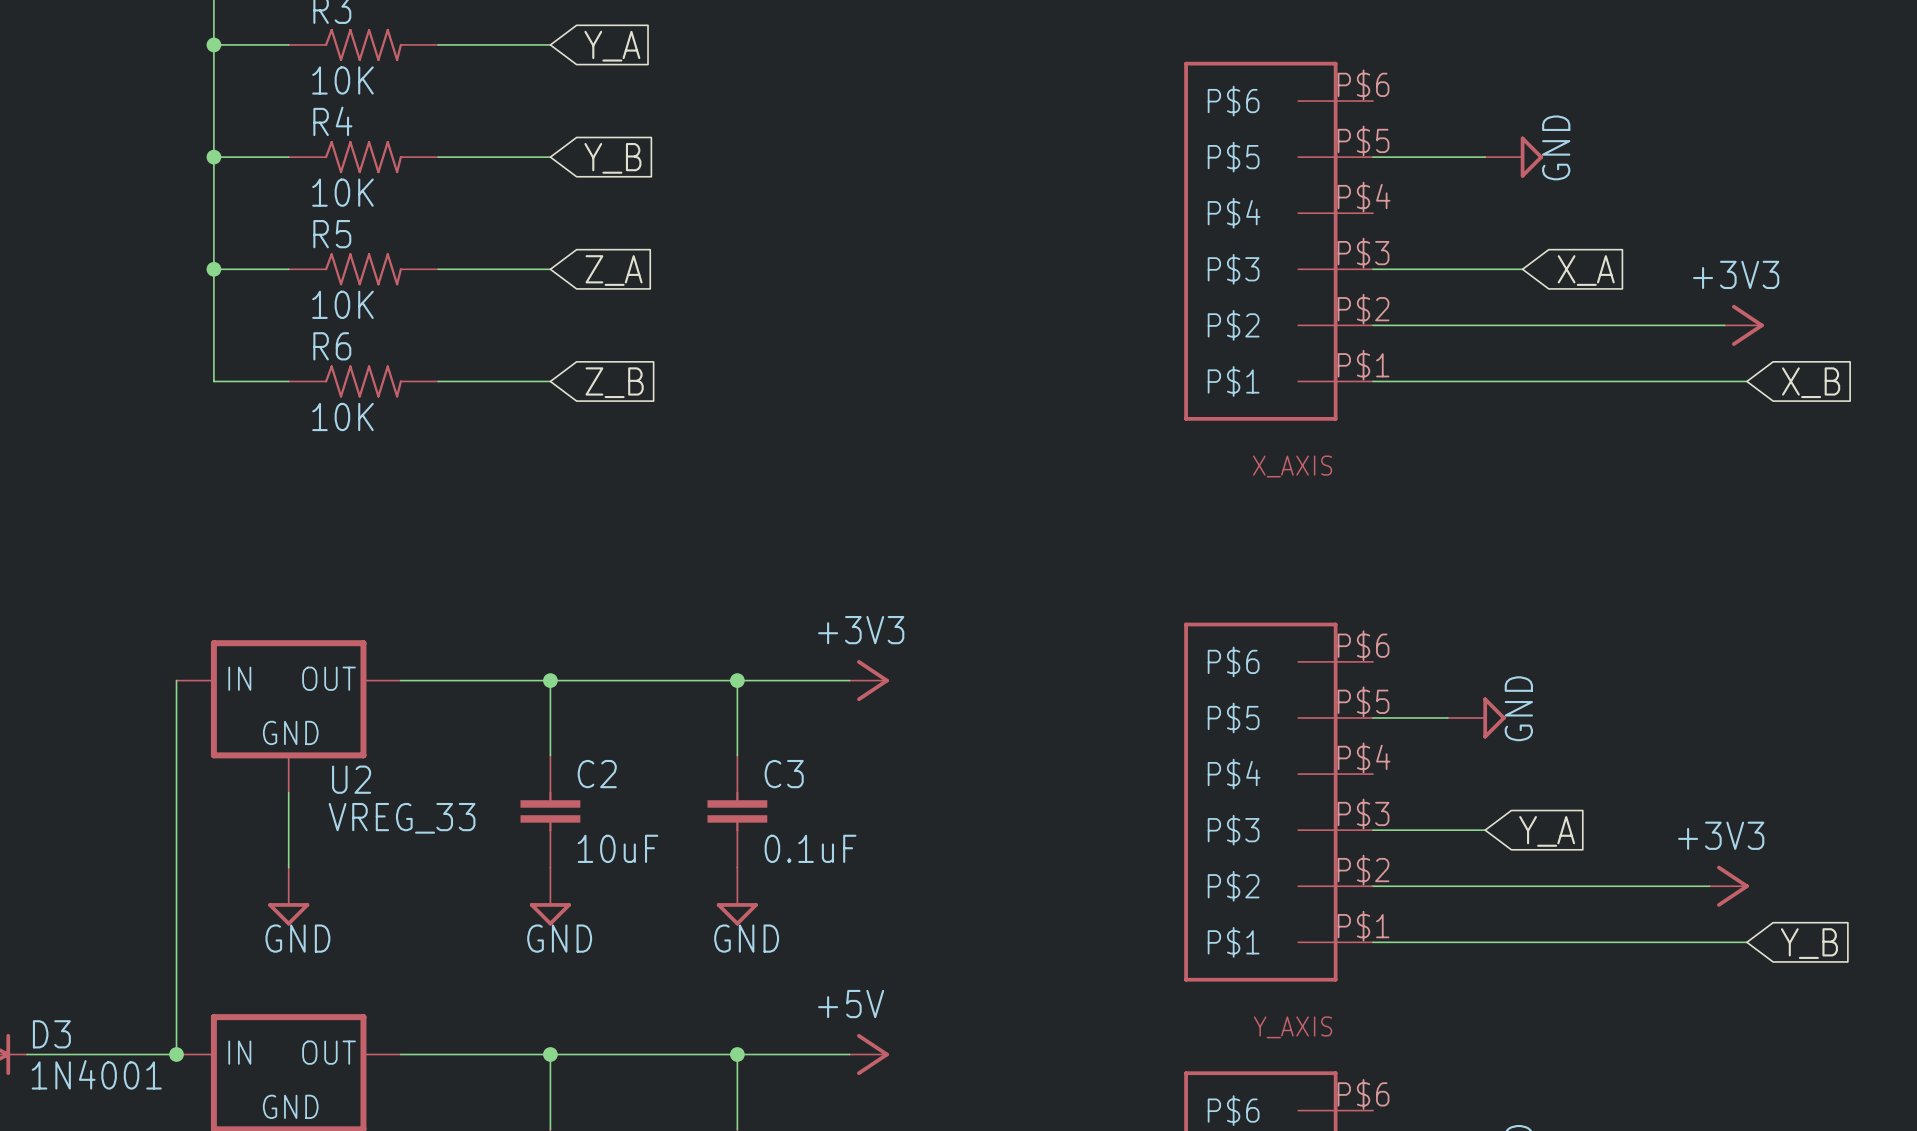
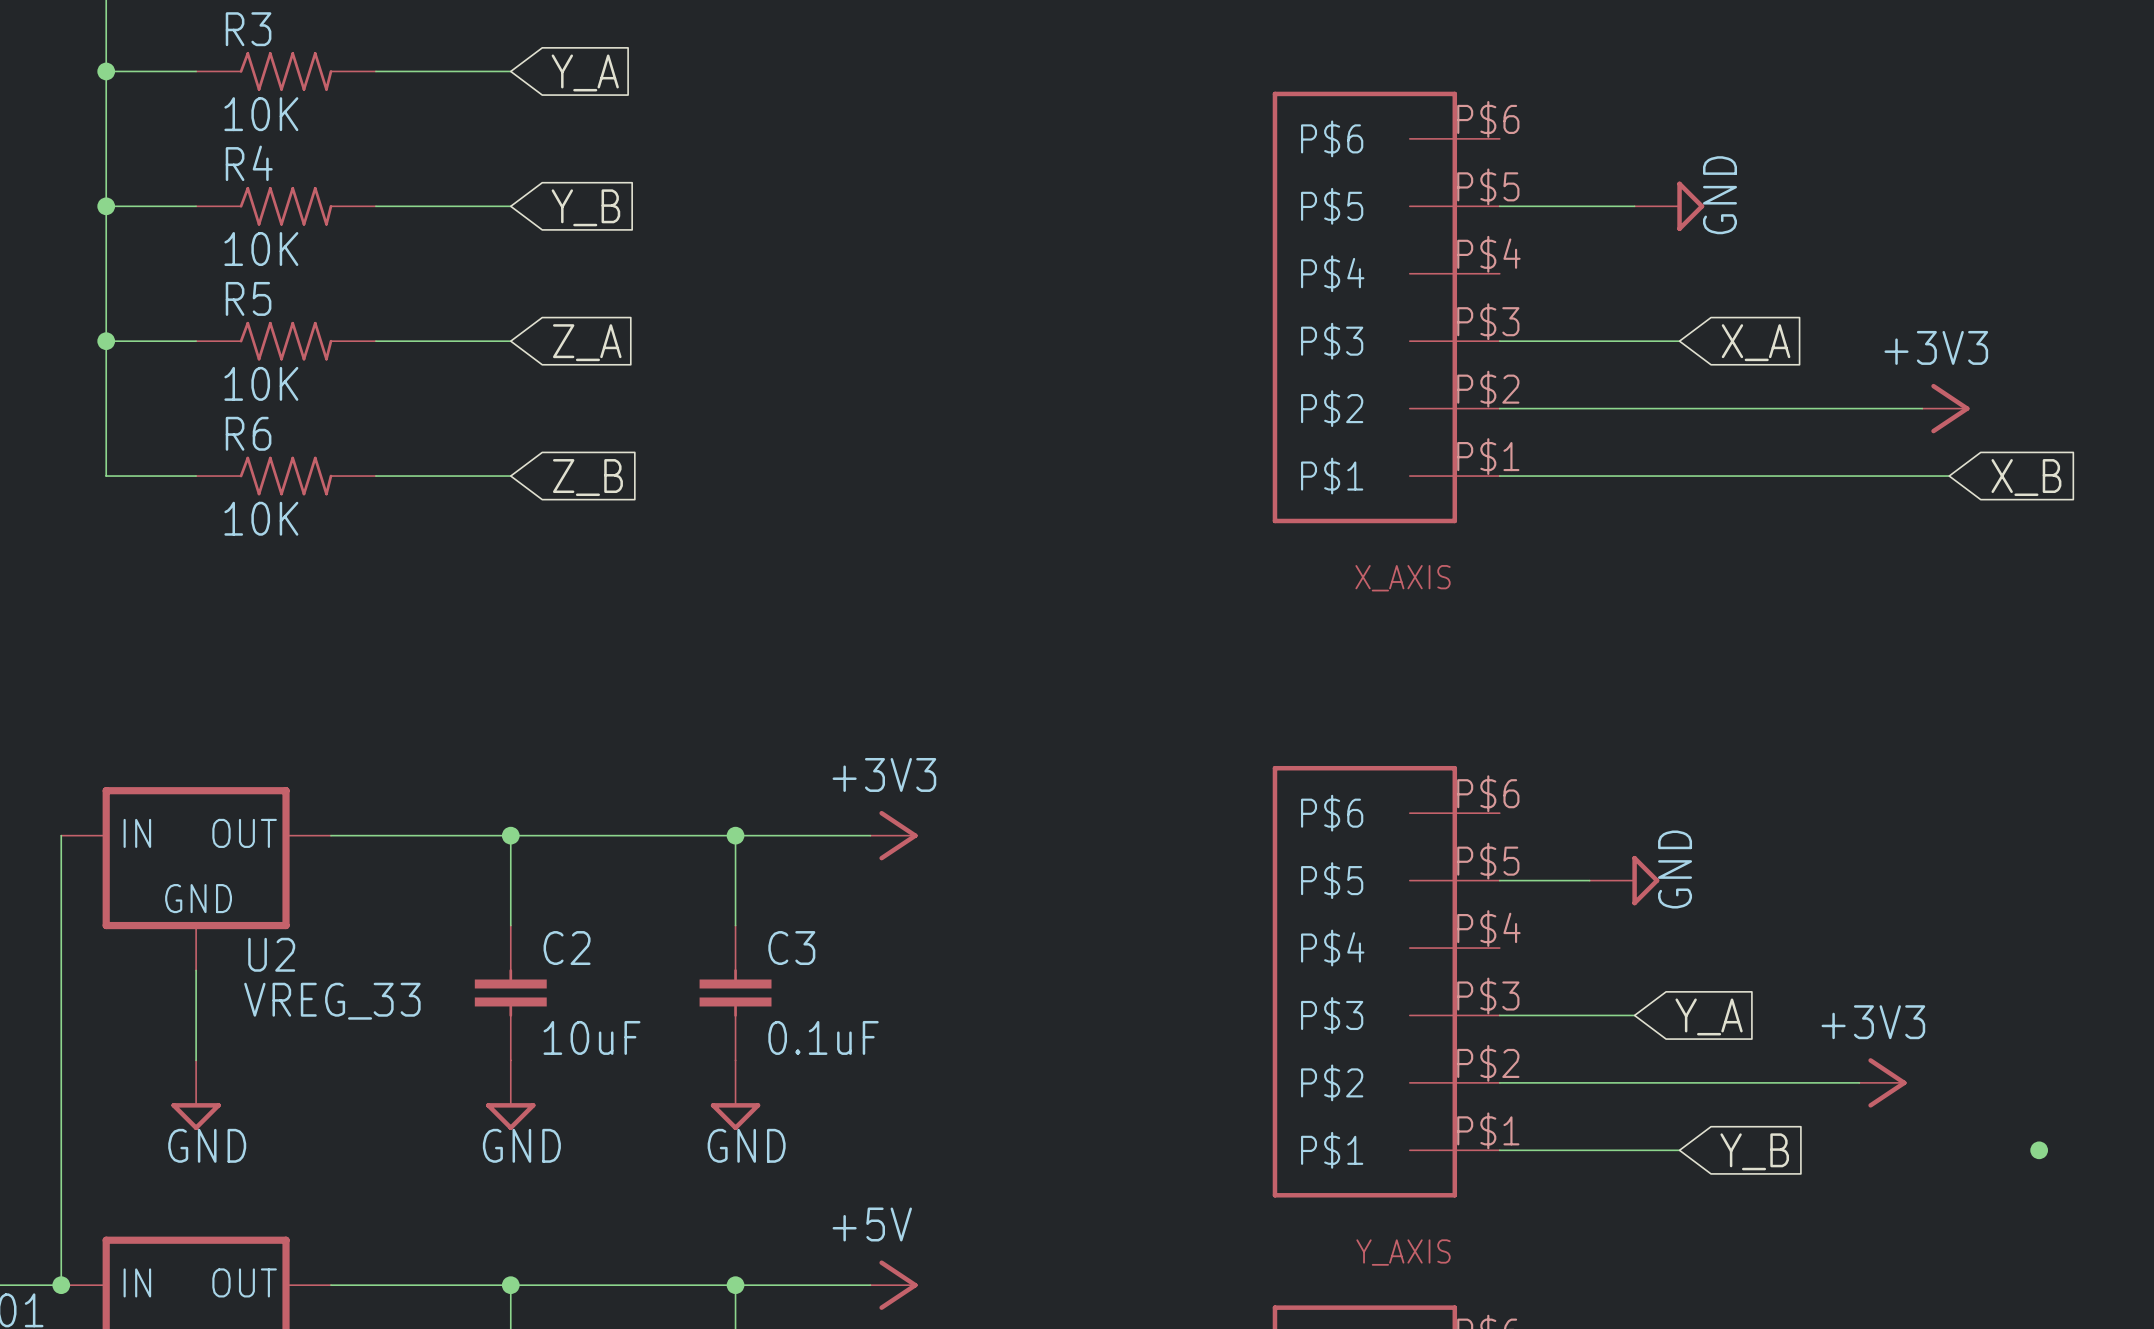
power symbol position: +3V3 (1729, 886) -> +3V3 (1882, 1082)
wire: (1522, 942) (1746, 942) -> none
junction: none -> (2039, 1150)
global label position: Y_B (1809, 943) -> Y_B (1754, 1151)

